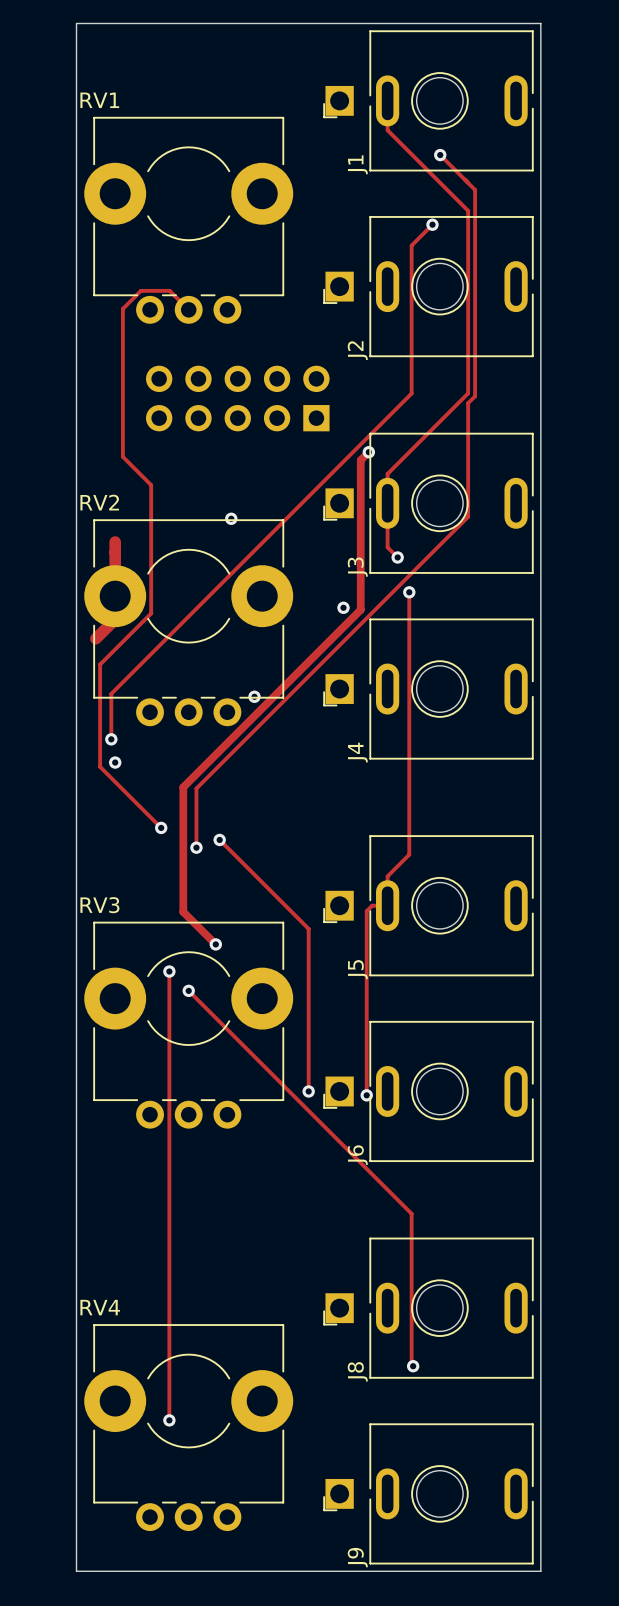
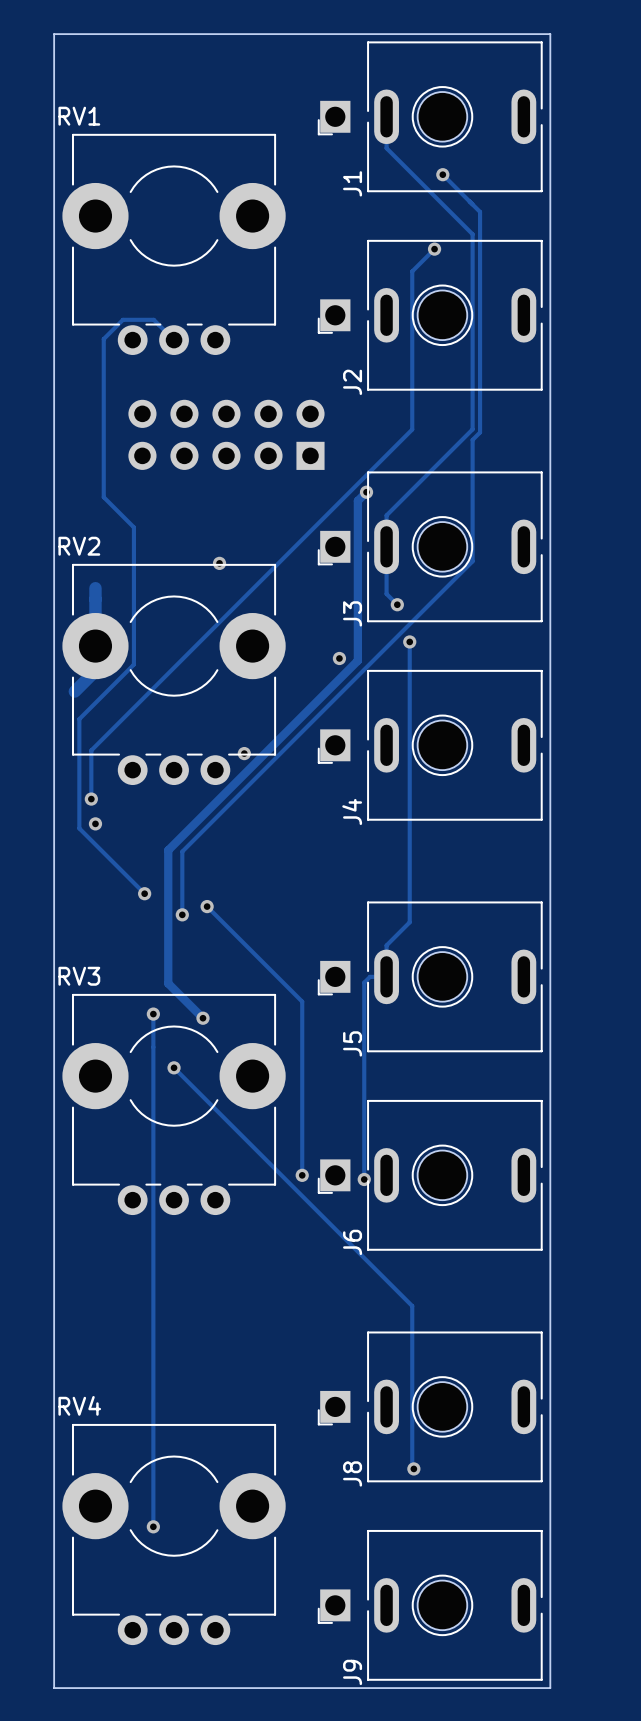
track: none -> (153, 1014) (153, 1047)
via position: (169, 971) -> (153, 1014)

